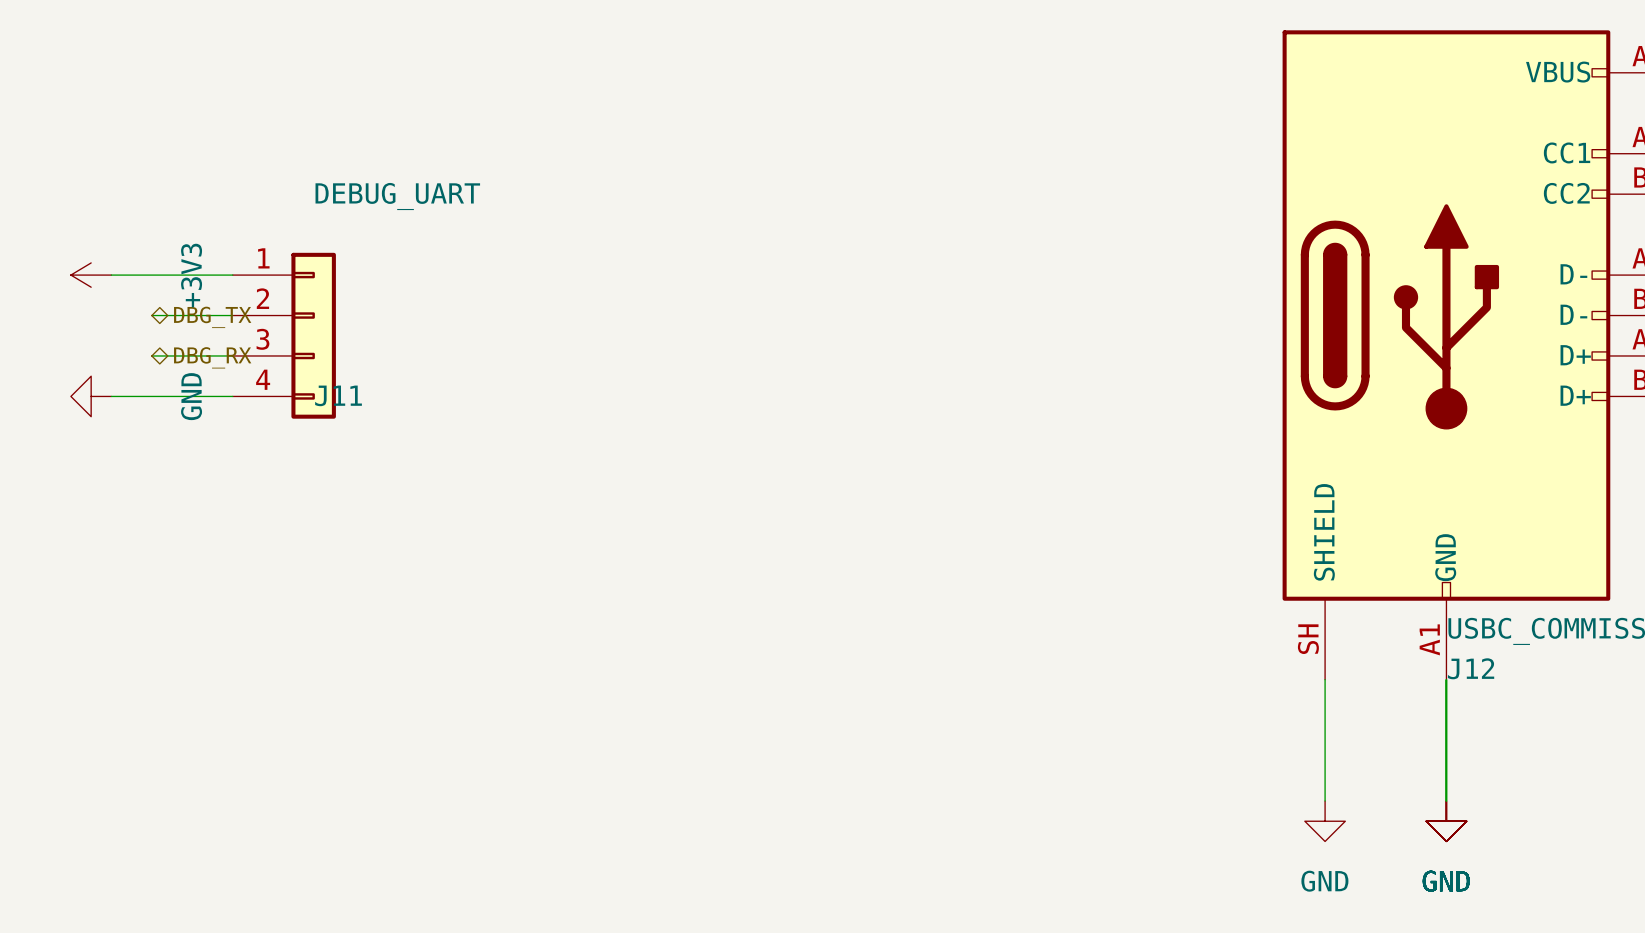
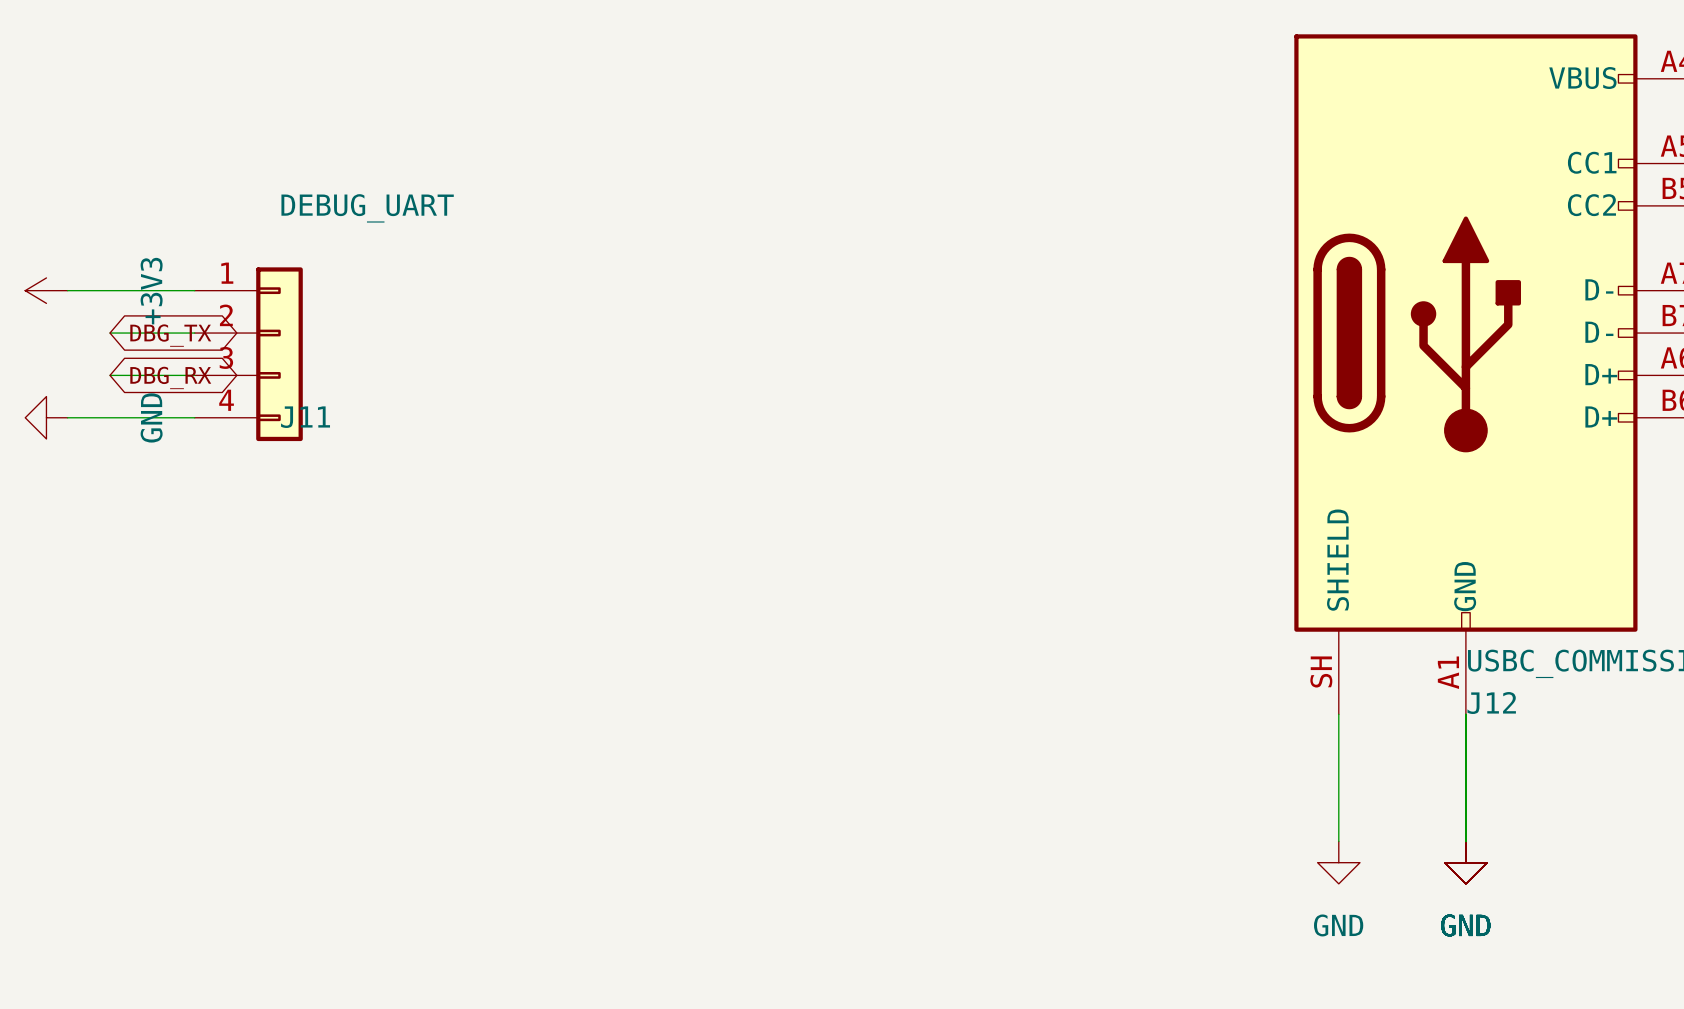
global label: none -> DBG_TX (170, 335)
hierarchical label: DBG_TX (212, 317) -> none
hierarchical label: DBG_RX (212, 357) -> none
global label: none -> DBG_RX (170, 377)

